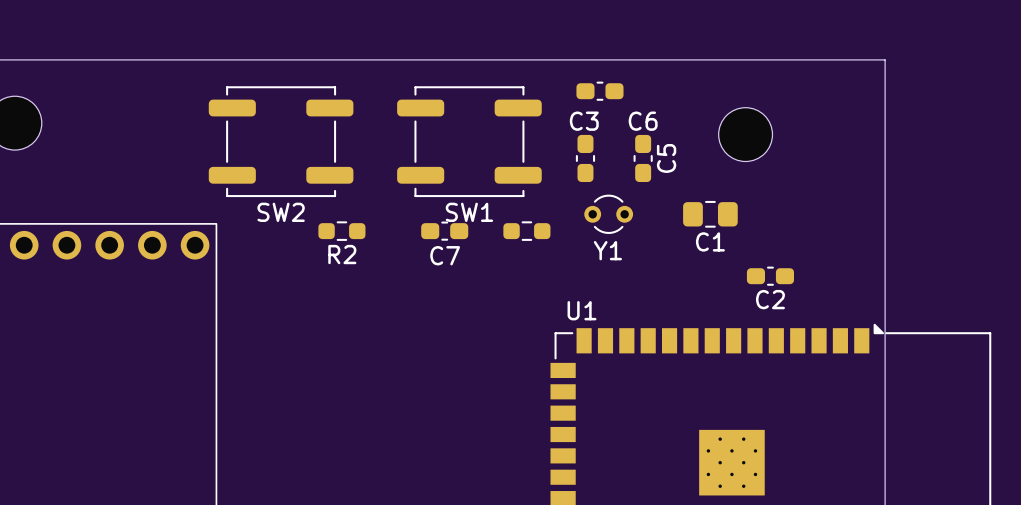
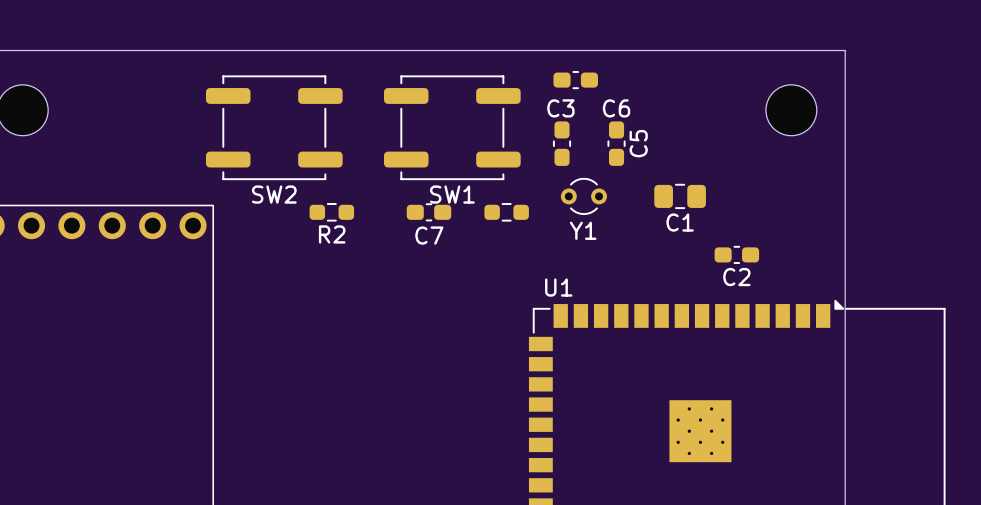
part position: (745, 134) -> (791, 110)

